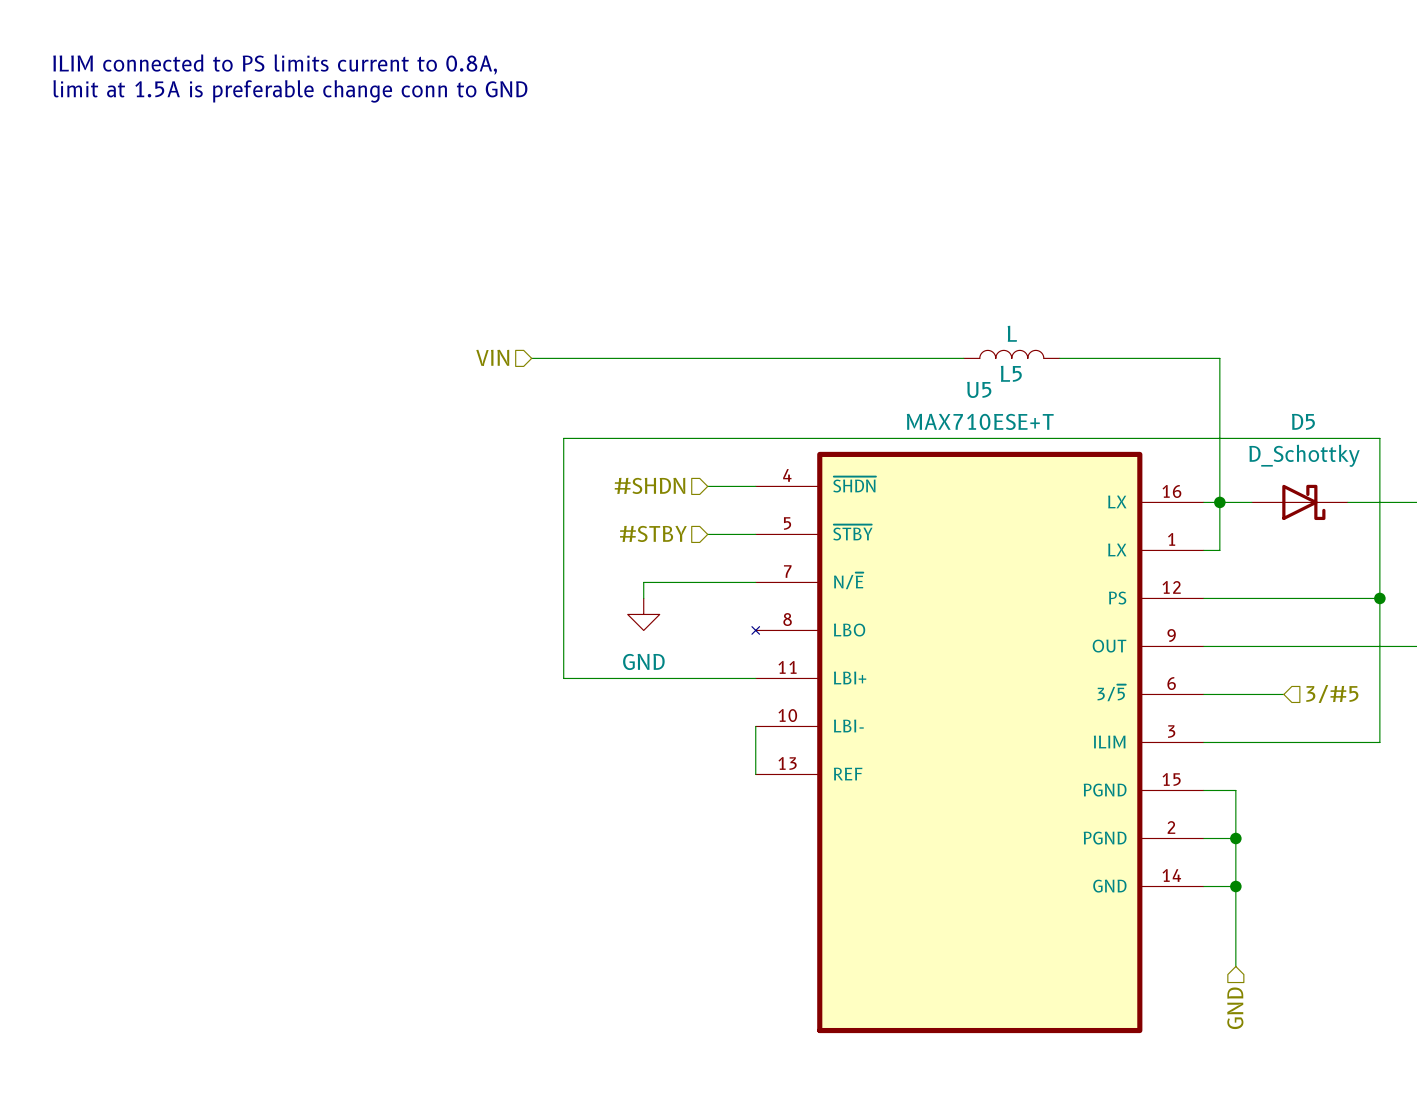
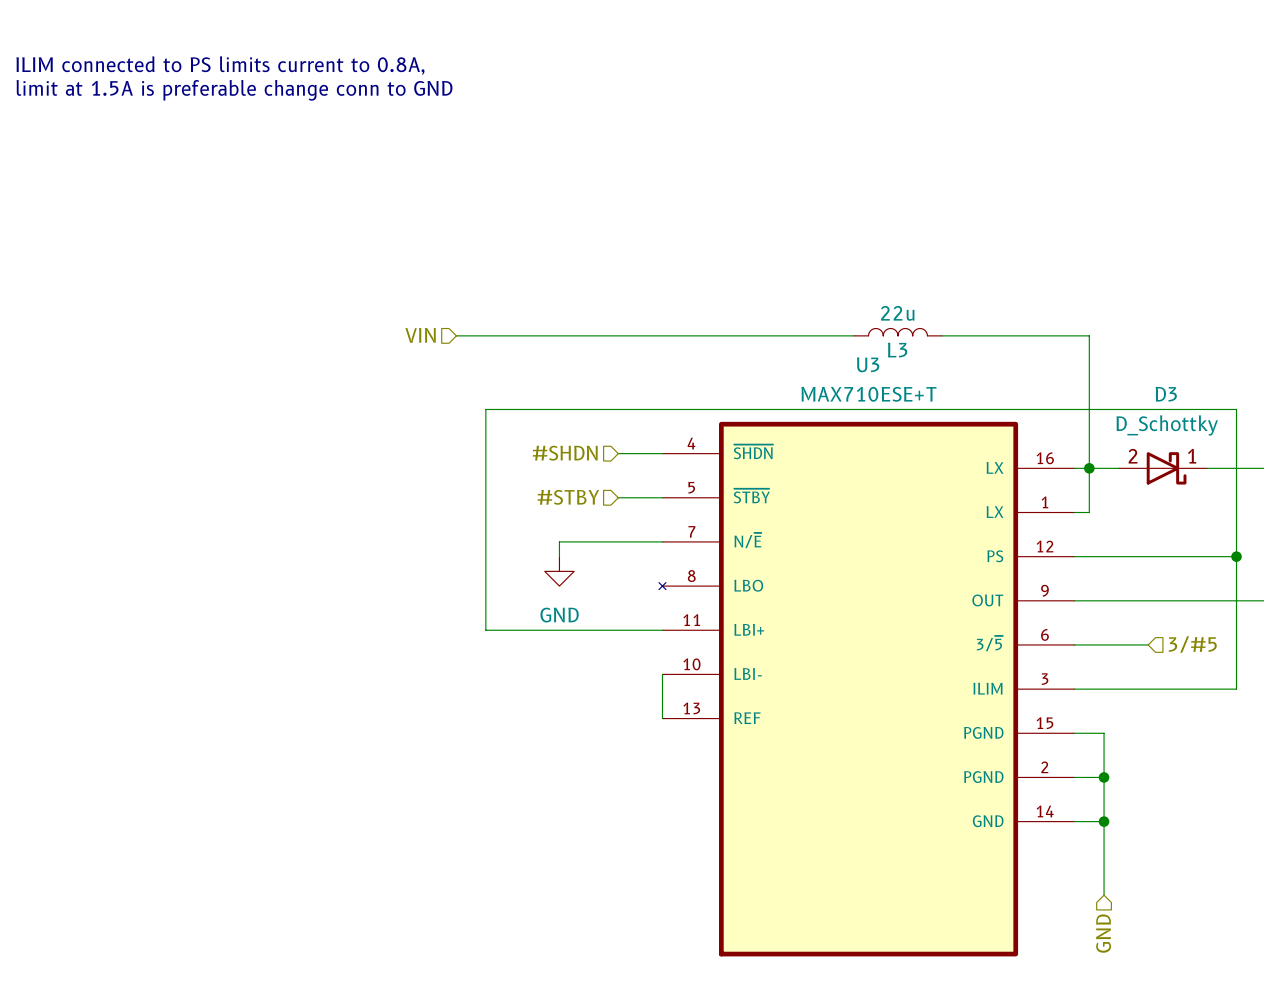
L5 value: L (1012, 333) -> 22u (897, 313)
L5 name: L5 (1011, 373) -> L3 (897, 350)
U5 name: U5 (979, 389) -> U3 (868, 364)
D5 name: D5 (1303, 421) -> D3 (1166, 394)
D5 pin number: none -> 2 (1133, 456)
D5 pin number: none -> 1 (1192, 456)

